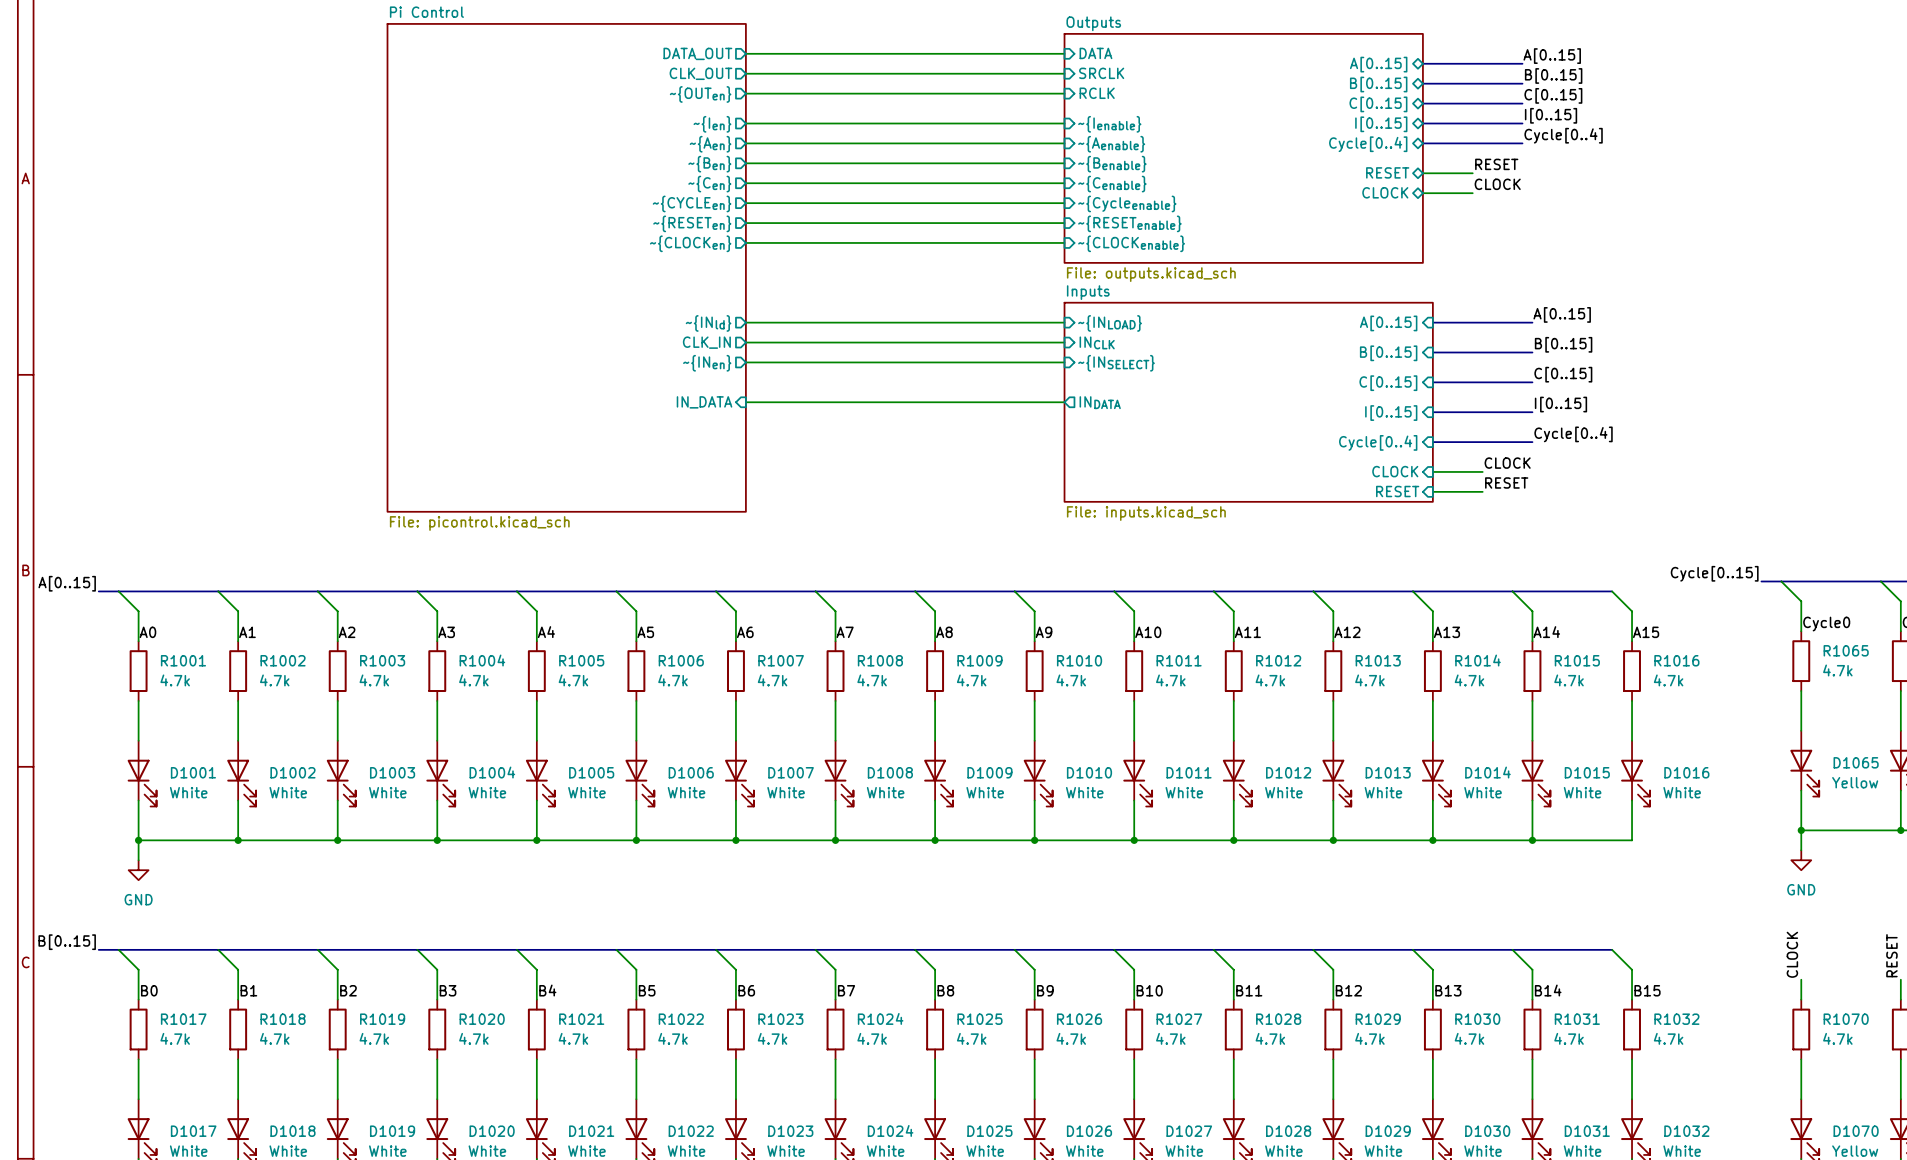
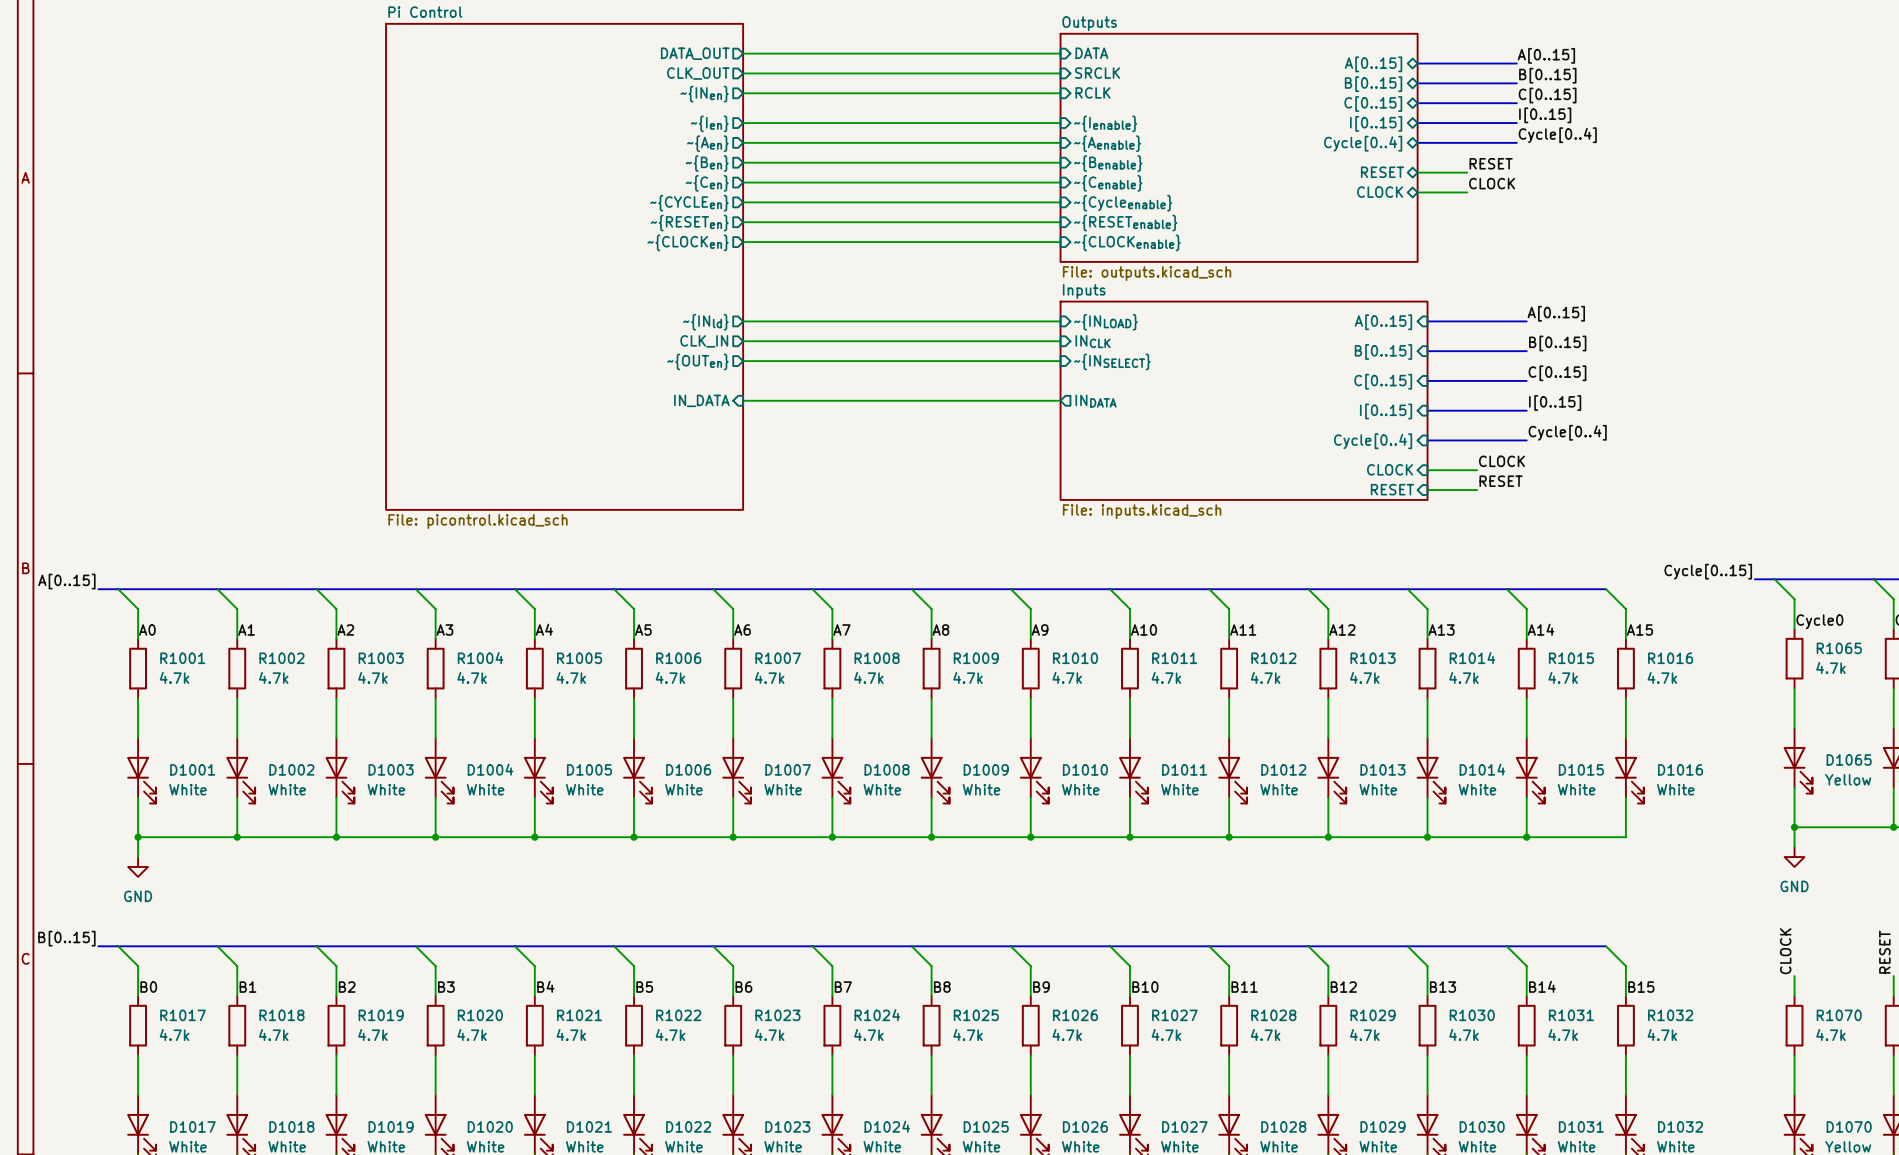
sheet pin: ~{OUTen} (700, 94) -> ~{INen} (704, 94)
sheet pin: ~{INen} (707, 363) -> ~{OUTen} (697, 361)

